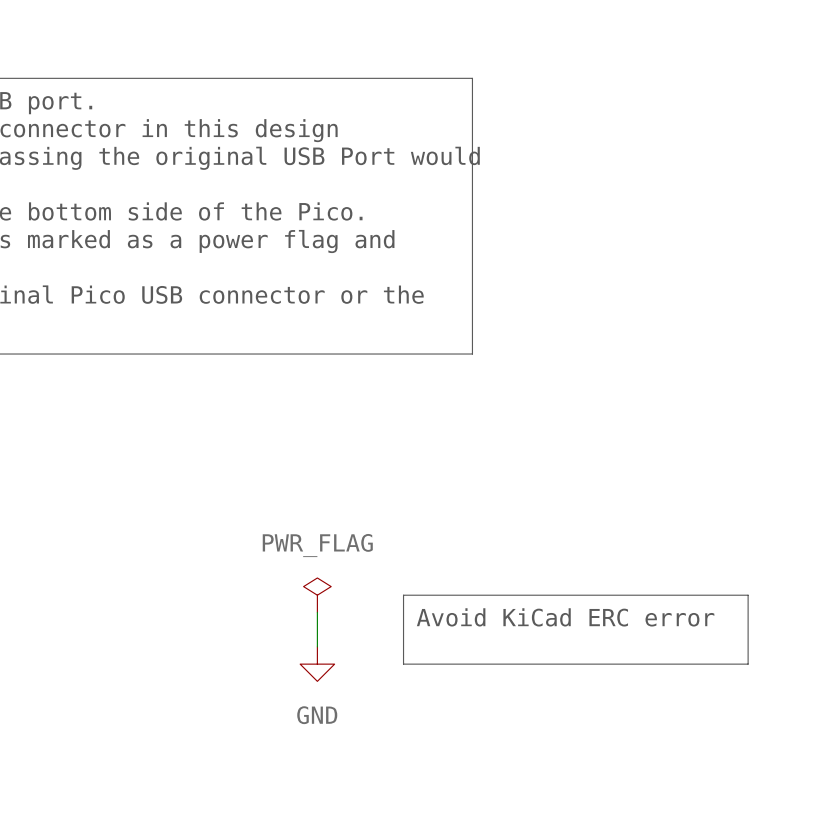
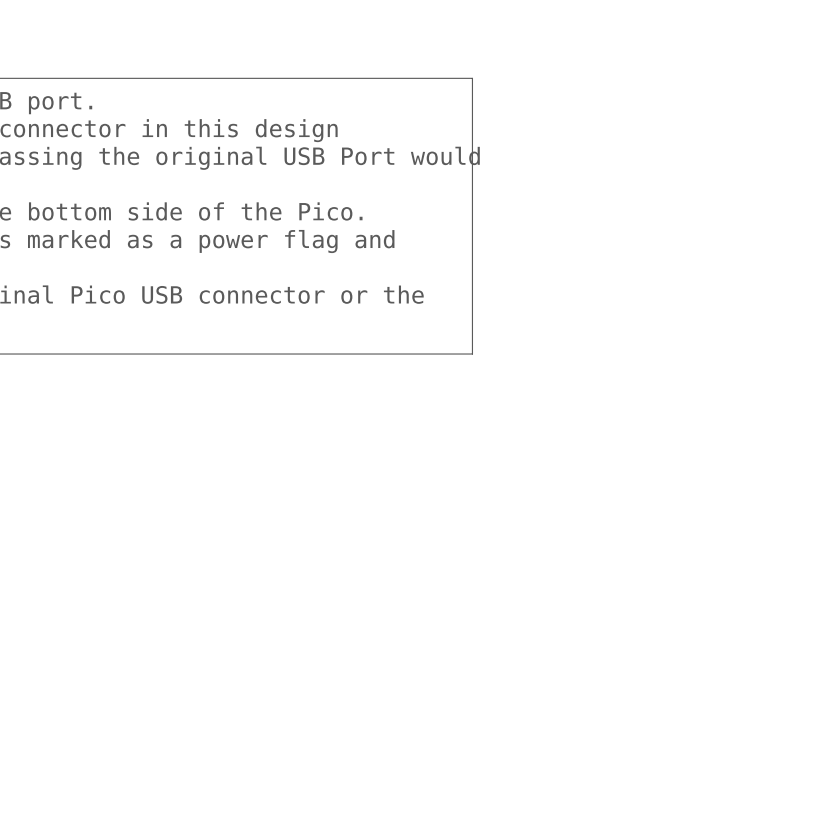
power symbol: PWR_FLAG (317, 595) -> none
line: (403, 595) (748, 595) (748, 664) (403, 664) (403, 595) -> none
wire: (317, 612) (317, 646) -> none
text: Avoid KiCad ERC error (565, 617) -> none
power symbol: GND (317, 664) -> none

